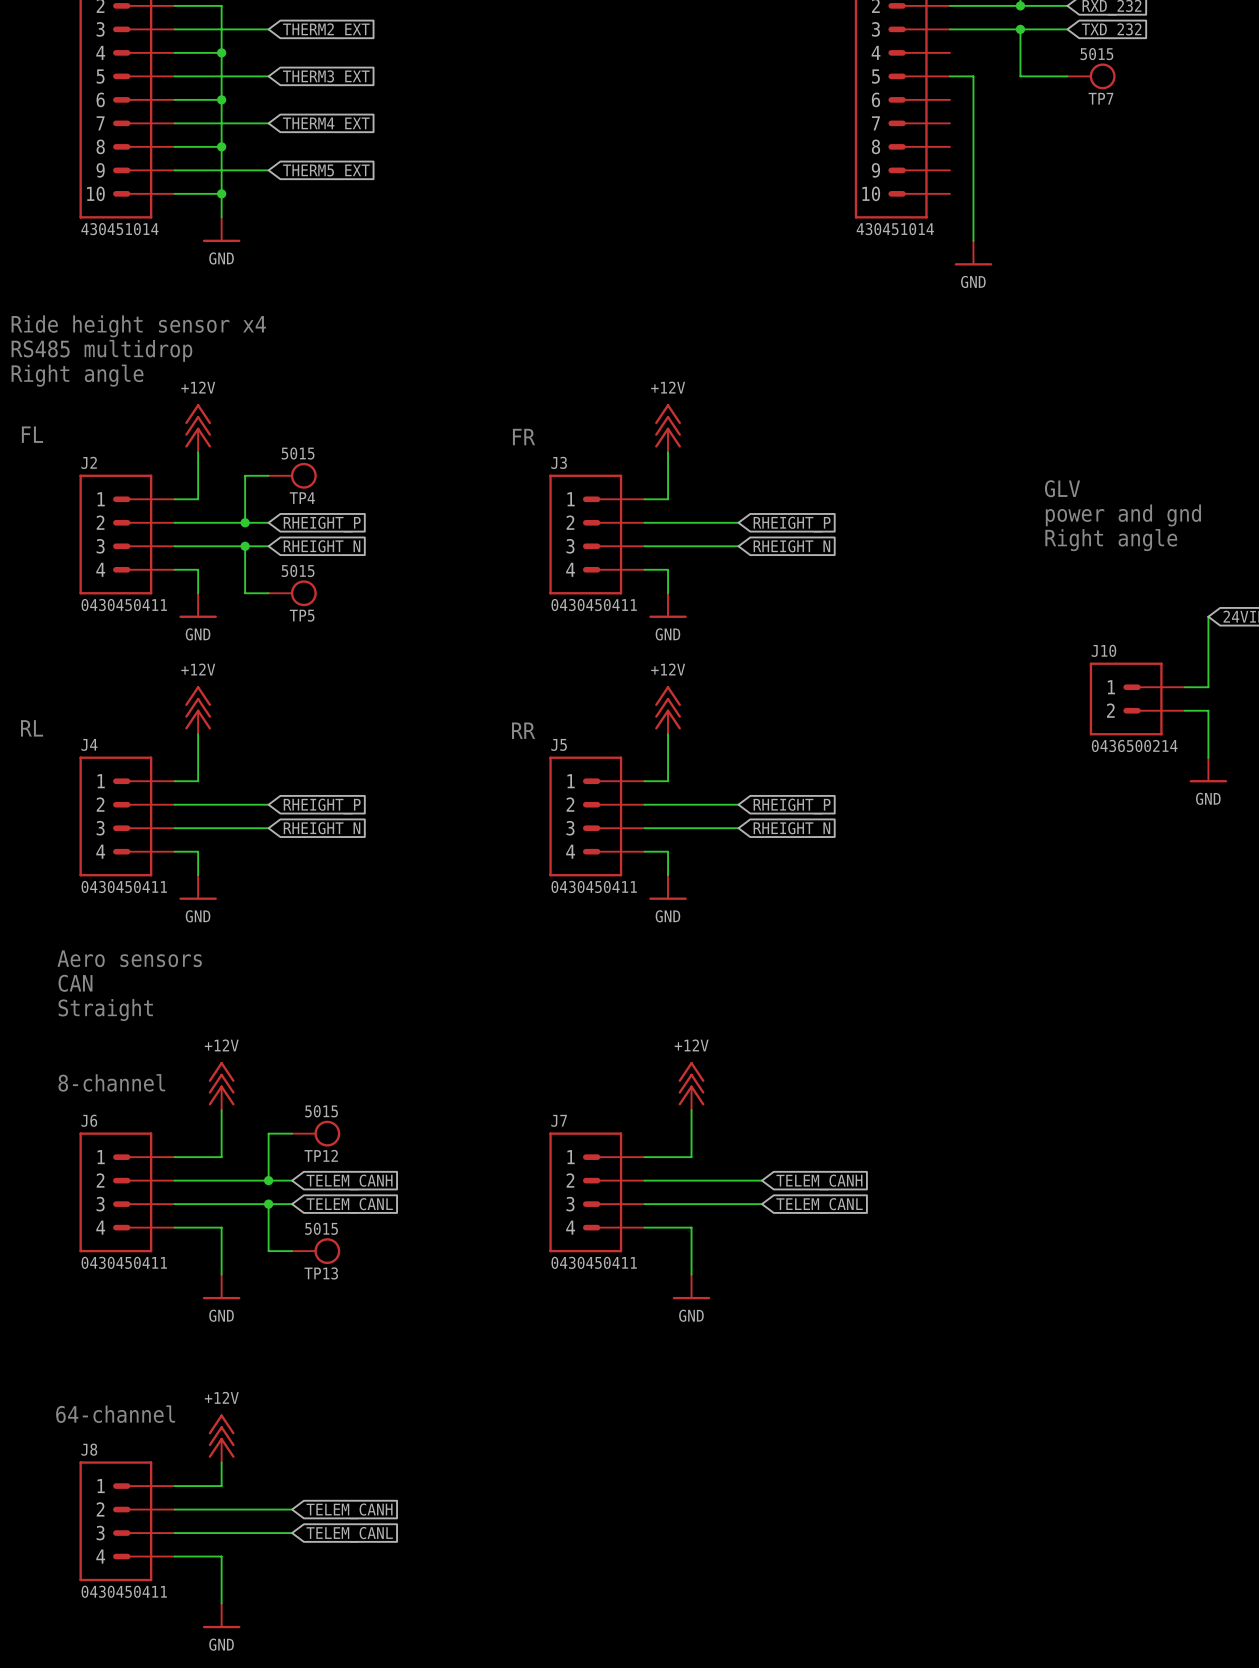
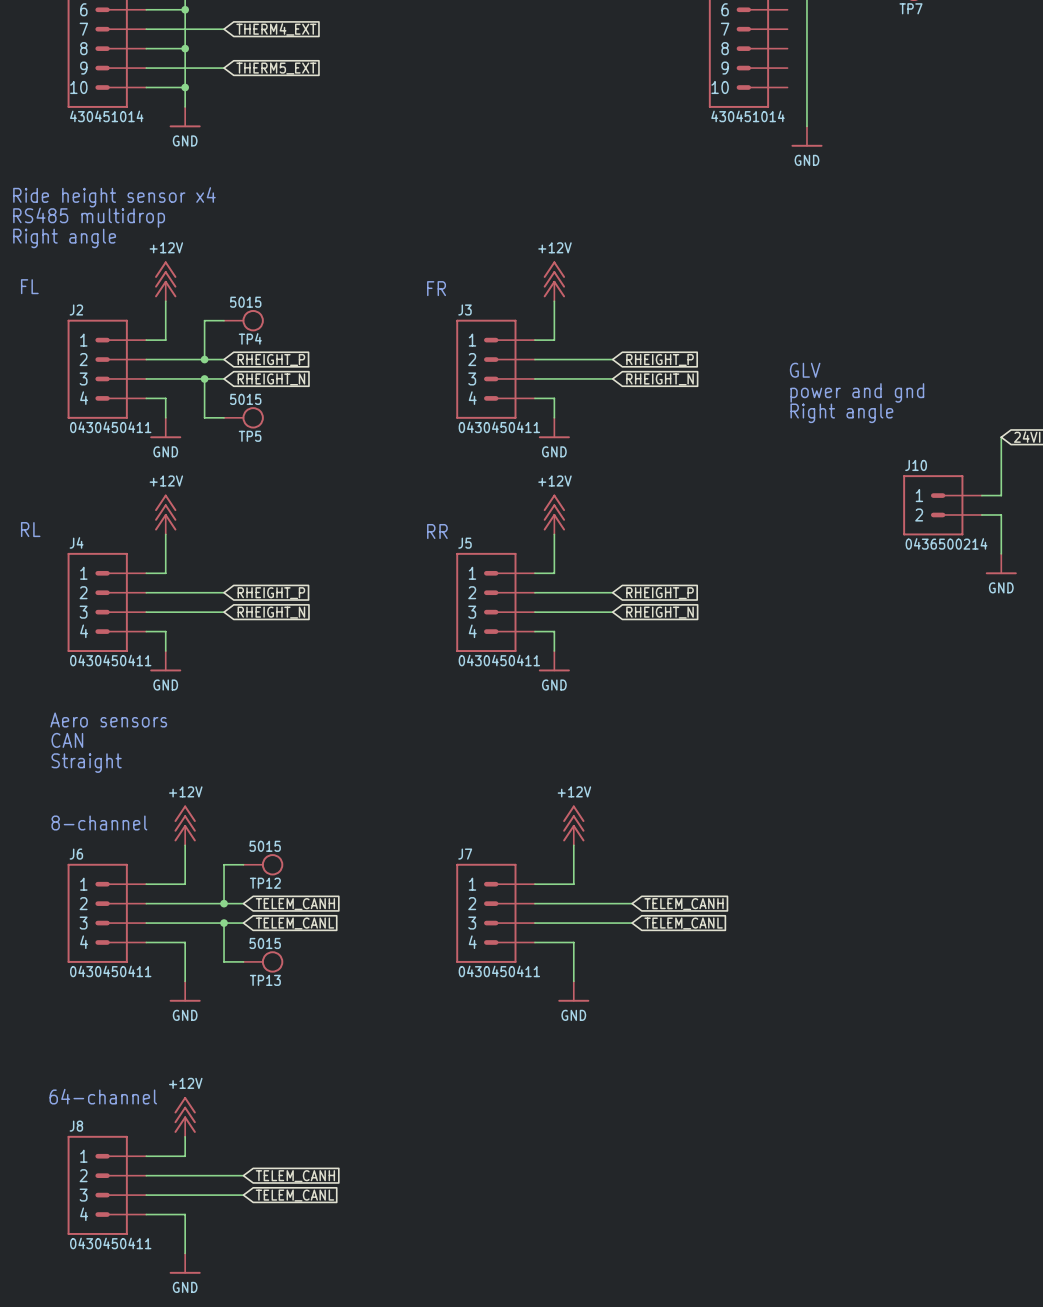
text position: GLV (1062, 488) -> GLV (805, 370)
text position: power and gnd (1123, 515) -> power and gnd (857, 392)
text position: Right angle (1111, 540) -> Right angle (841, 413)

